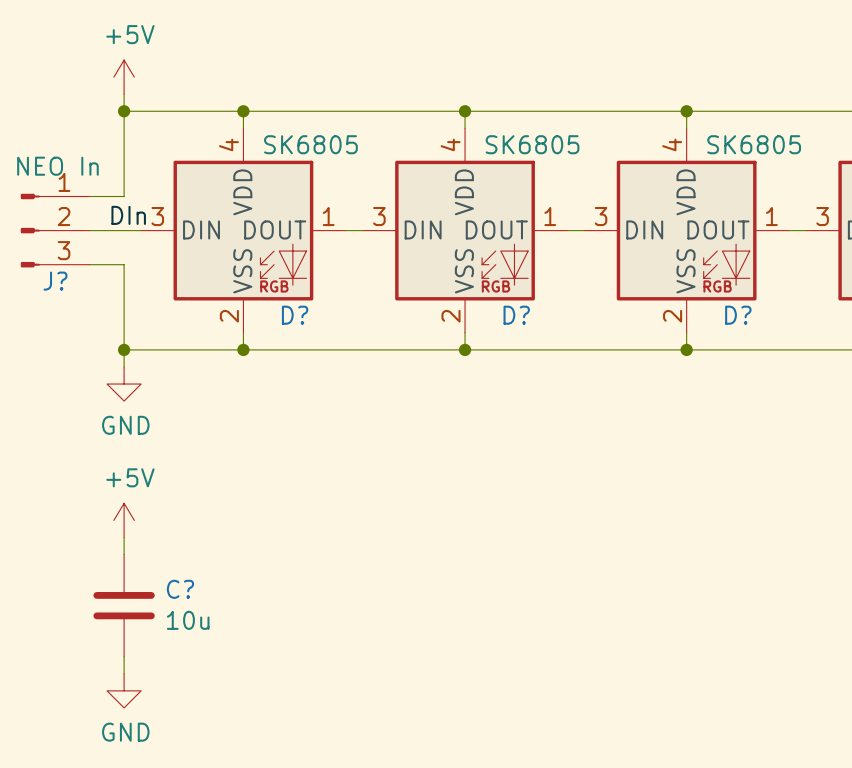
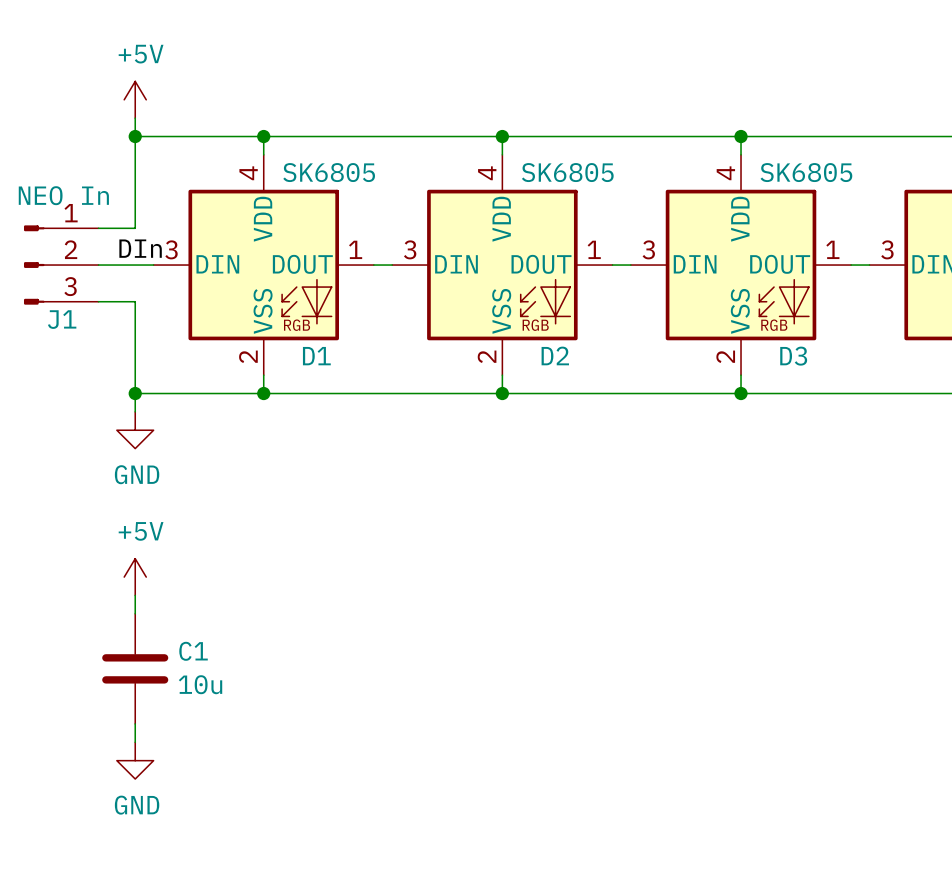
J? name: J? (55, 281) -> J1 (62, 319)
D? name: D? (295, 315) -> D1 (316, 356)
D? name: D? (516, 315) -> D2 (555, 355)
D? name: D? (738, 315) -> D3 (793, 356)
C? name: C? (180, 589) -> C1 (193, 651)

